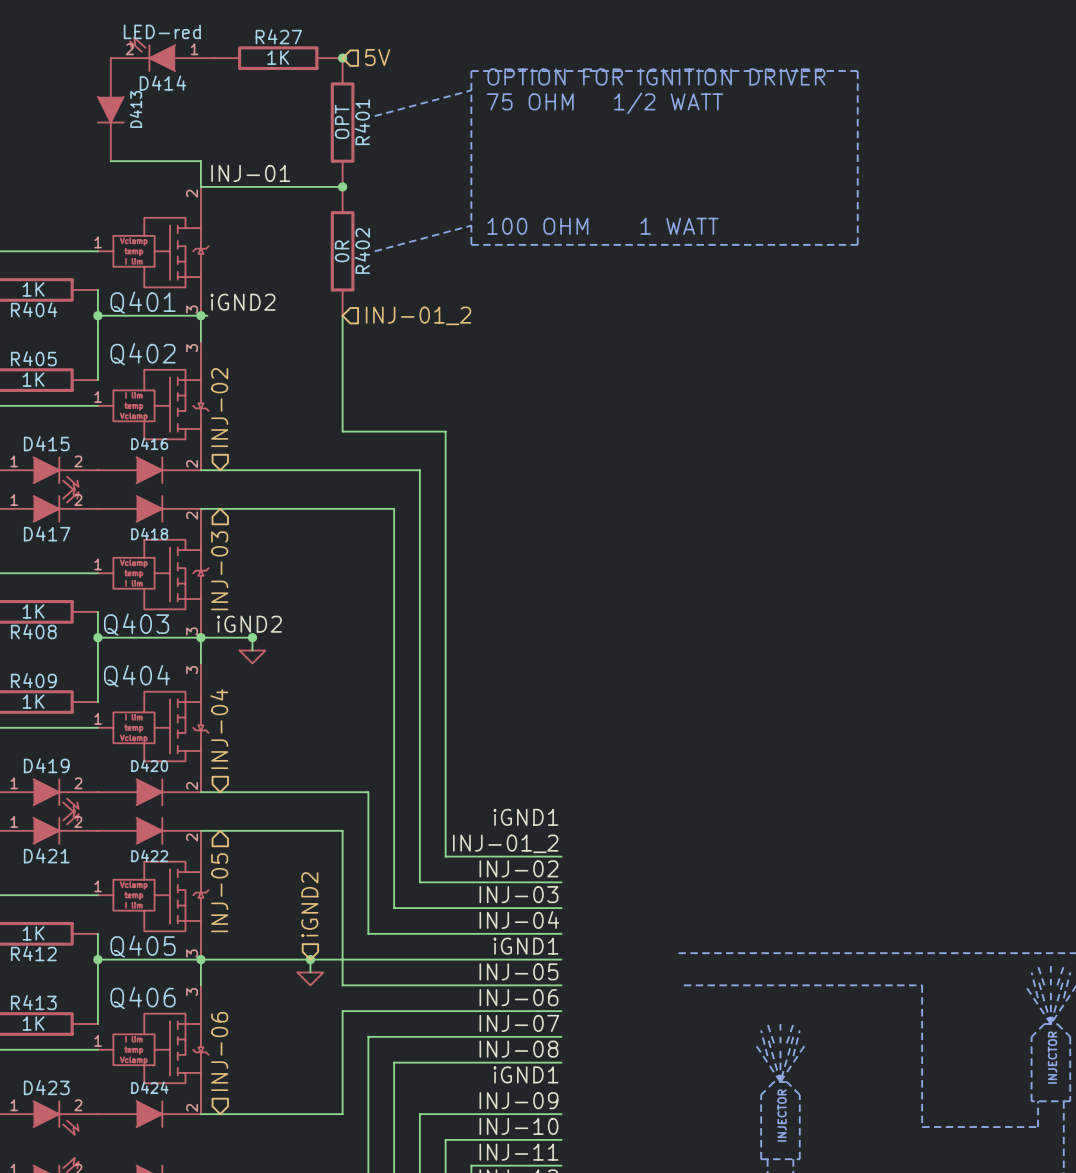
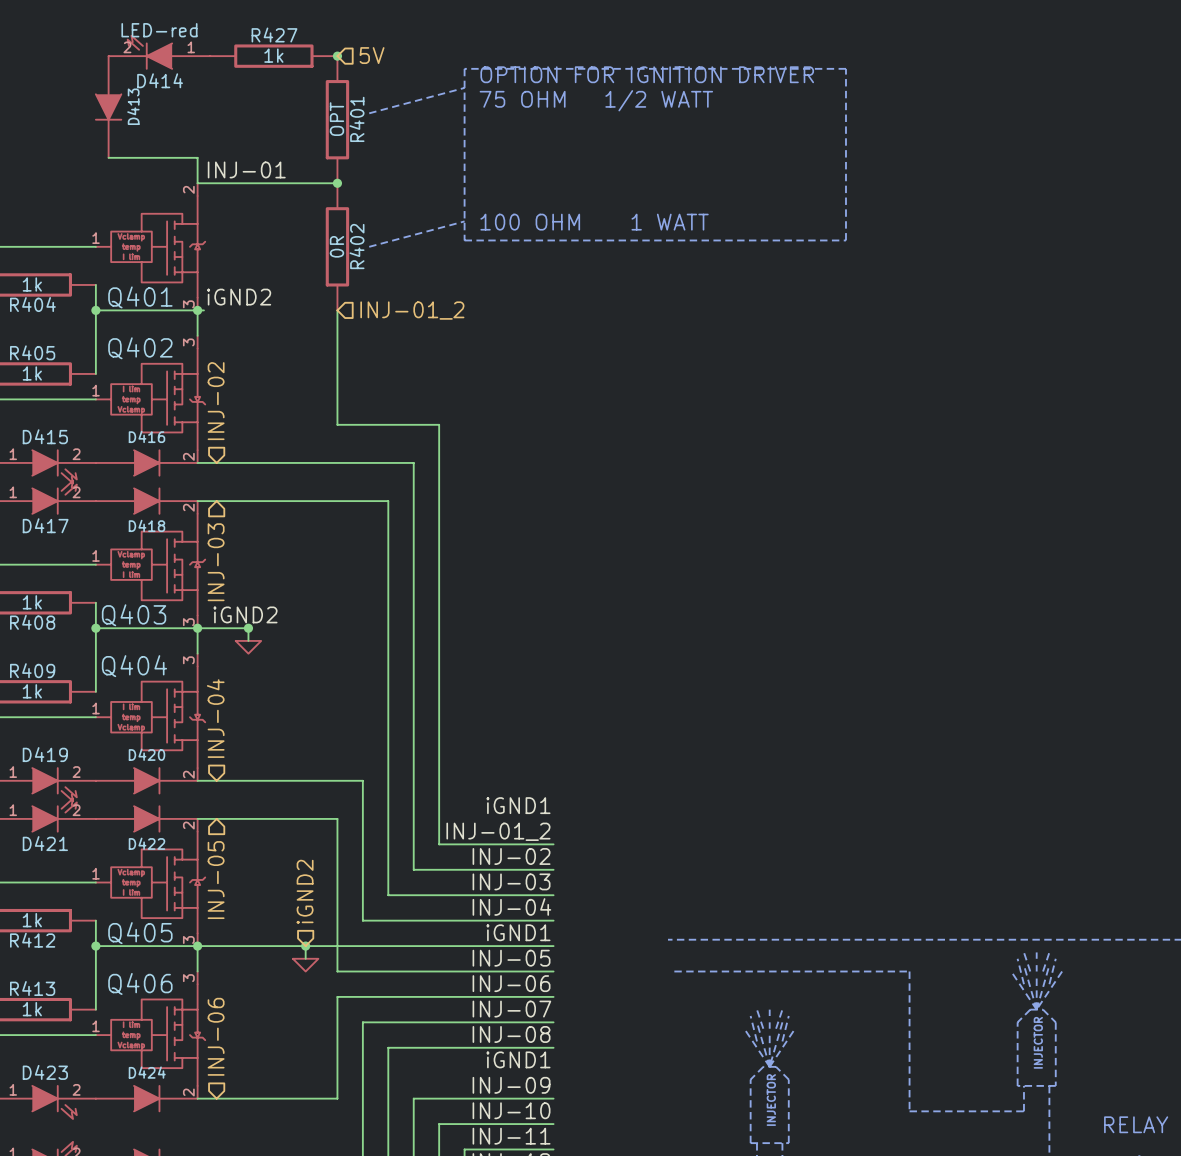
R427 value: 1K (278, 57) -> 1k (273, 55)
R404 value: 1K (33, 289) -> 1k (32, 284)
R405 value: 1K (33, 379) -> 1k (32, 373)
R408 value: 1K (33, 611) -> 1k (32, 602)
R409 value: 1K (33, 701) -> 1k (32, 691)
R412 value: 1K (33, 933) -> 1k (32, 920)
R413 value: 1K (33, 1023) -> 1k (32, 1009)

